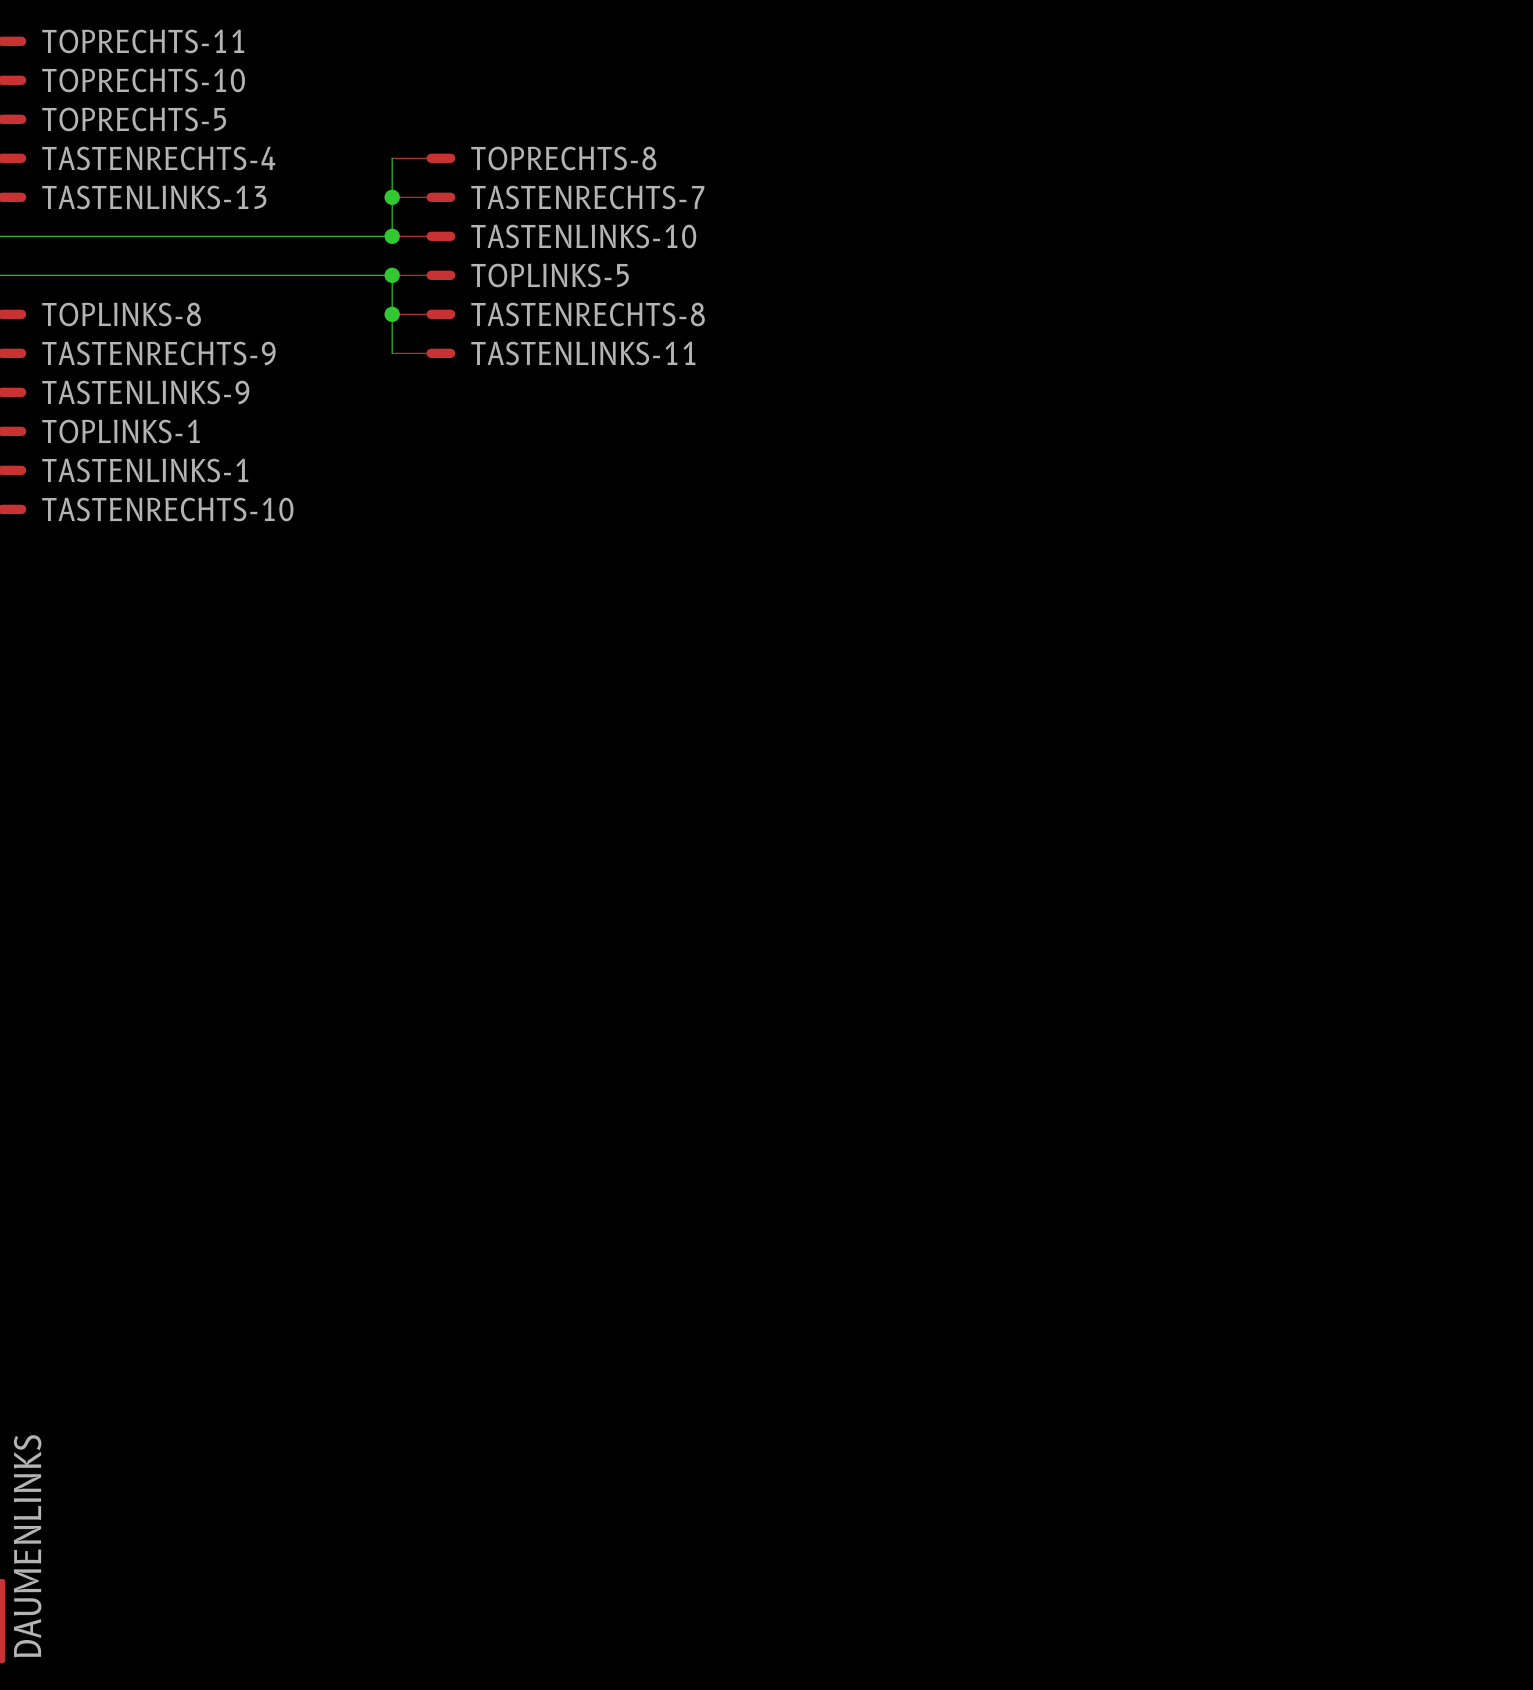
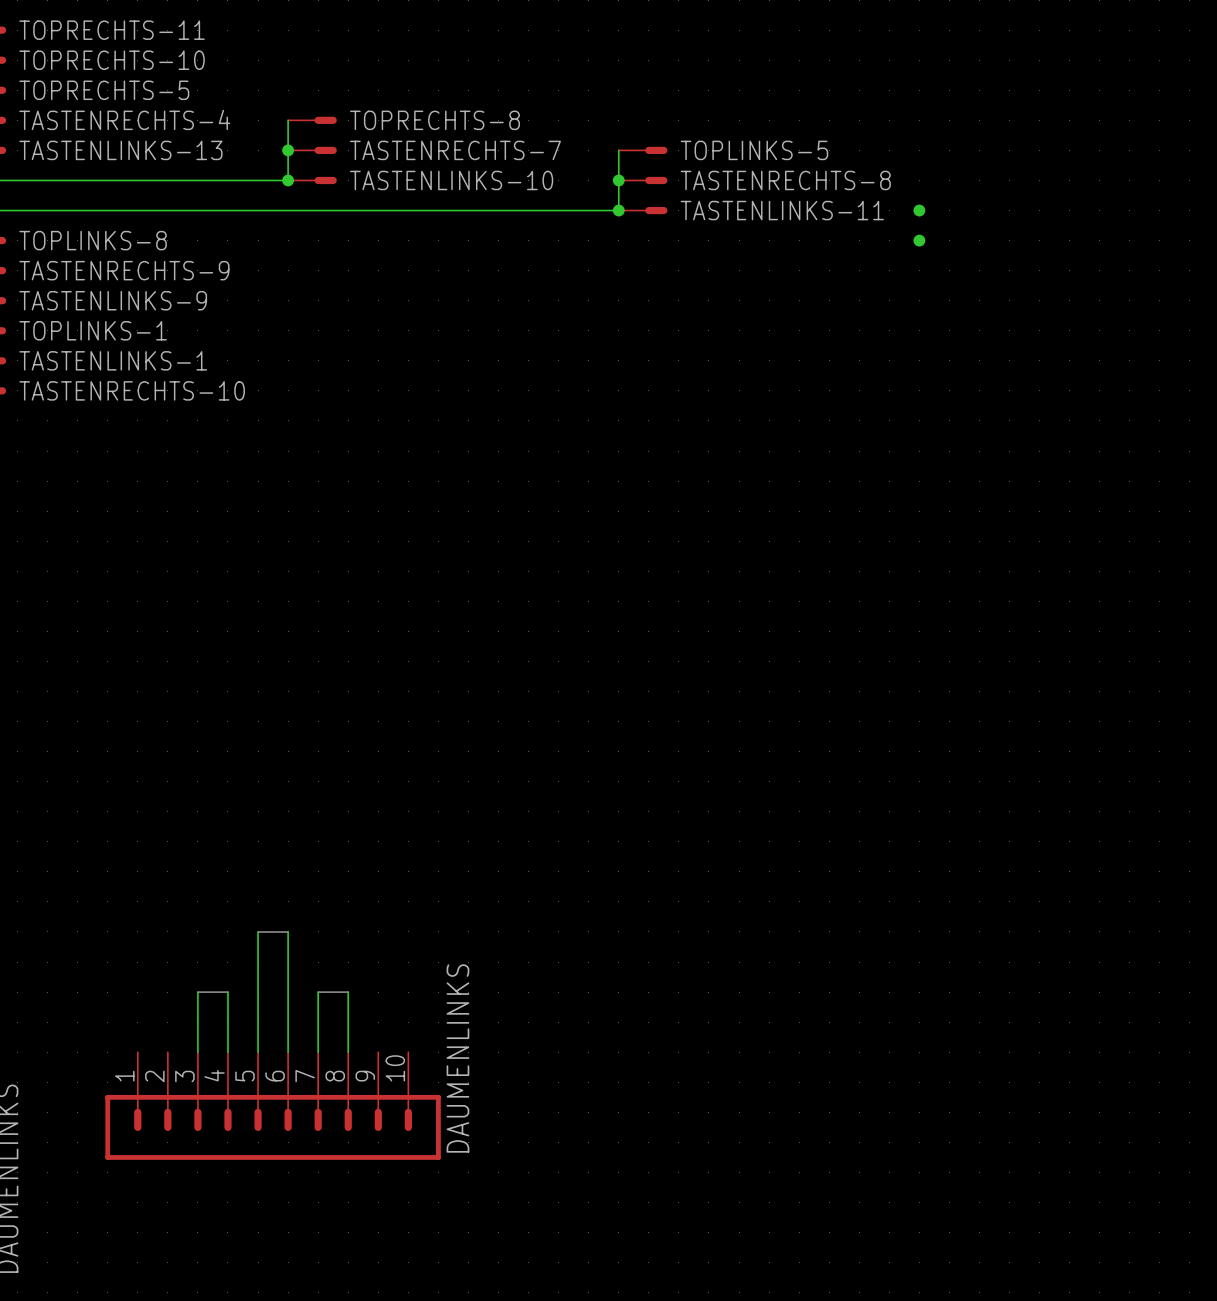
junction: none -> (618, 180)
wire: (392, 275) (392, 353) -> (288, 210) (618, 210) (618, 150)
junction: (392, 275) -> none
TOPLINKS-5 position: (423, 275) -> (643, 150)
junction: none -> (618, 210)
junction: none -> (919, 210)
junction: (392, 314) -> none
TASTENRECHTS-8 position: (423, 314) -> (643, 180)
junction: none -> (919, 240)
TASTENLINKS-11 position: (423, 353) -> (643, 210)
wire: none -> (258, 931) (258, 1052)
bus: none -> (258, 931) (288, 931)
wire: none -> (288, 931) (288, 1052)
wire: none -> (197, 992) (197, 1052)
bus: none -> (197, 992) (227, 992)
wire: none -> (227, 992) (227, 1052)
wire: none -> (318, 992) (318, 1052)
bus: none -> (318, 992) (348, 992)
wire: none -> (348, 992) (348, 1052)
DAUMENLINKS: none -> (273, 1106)

